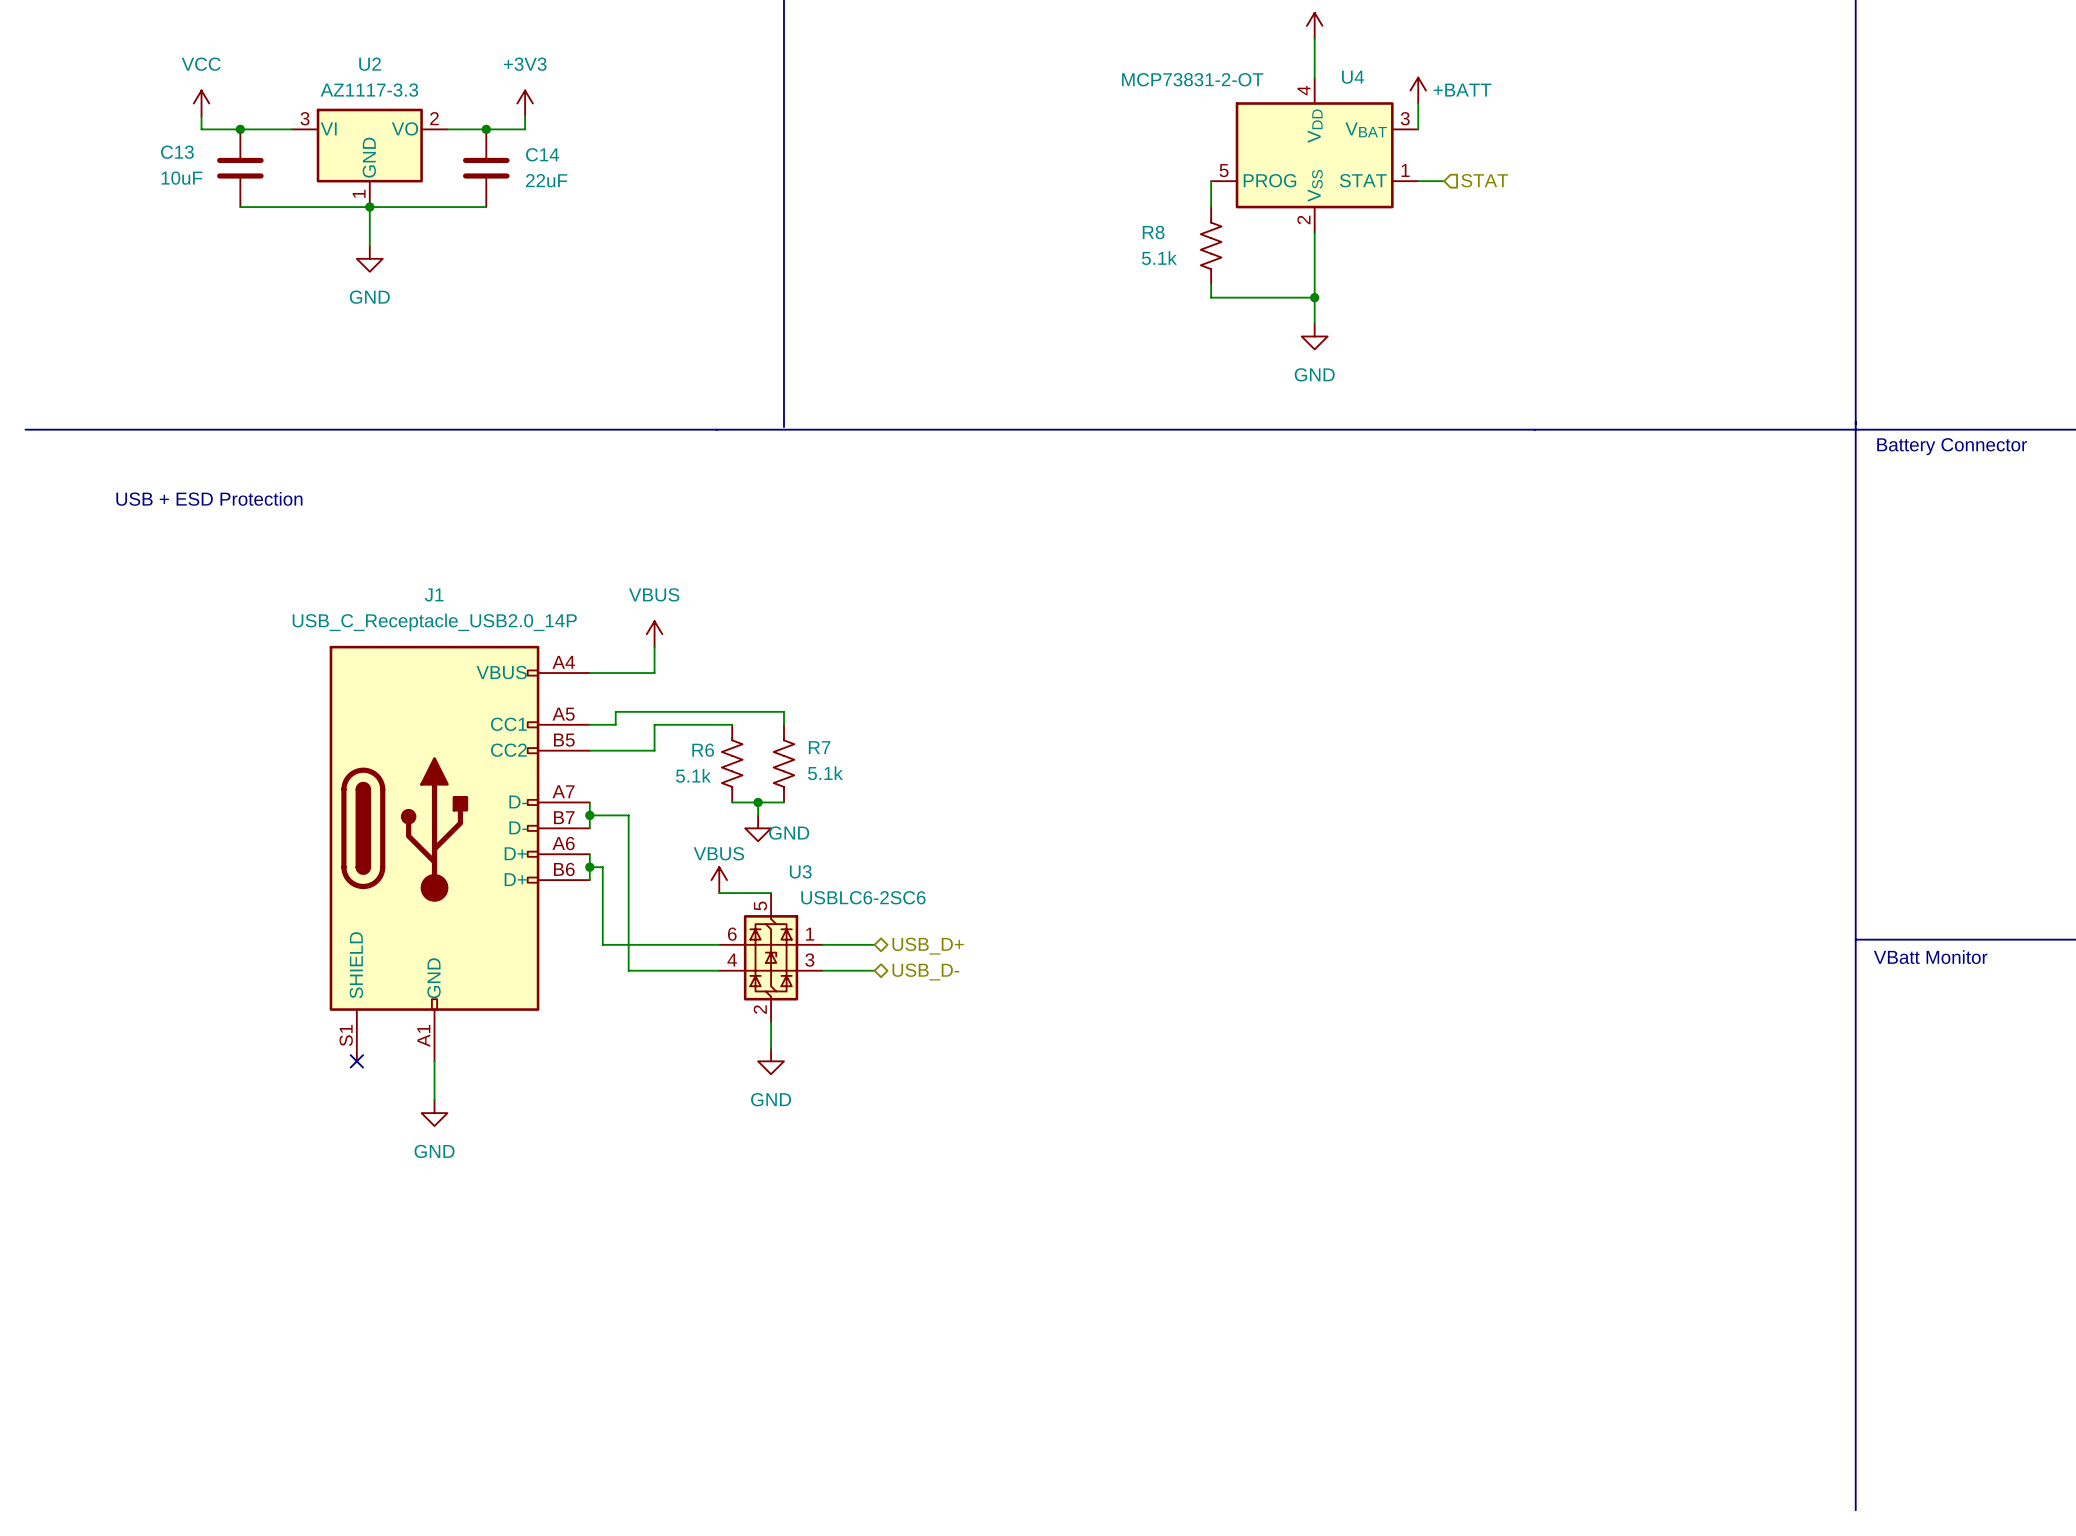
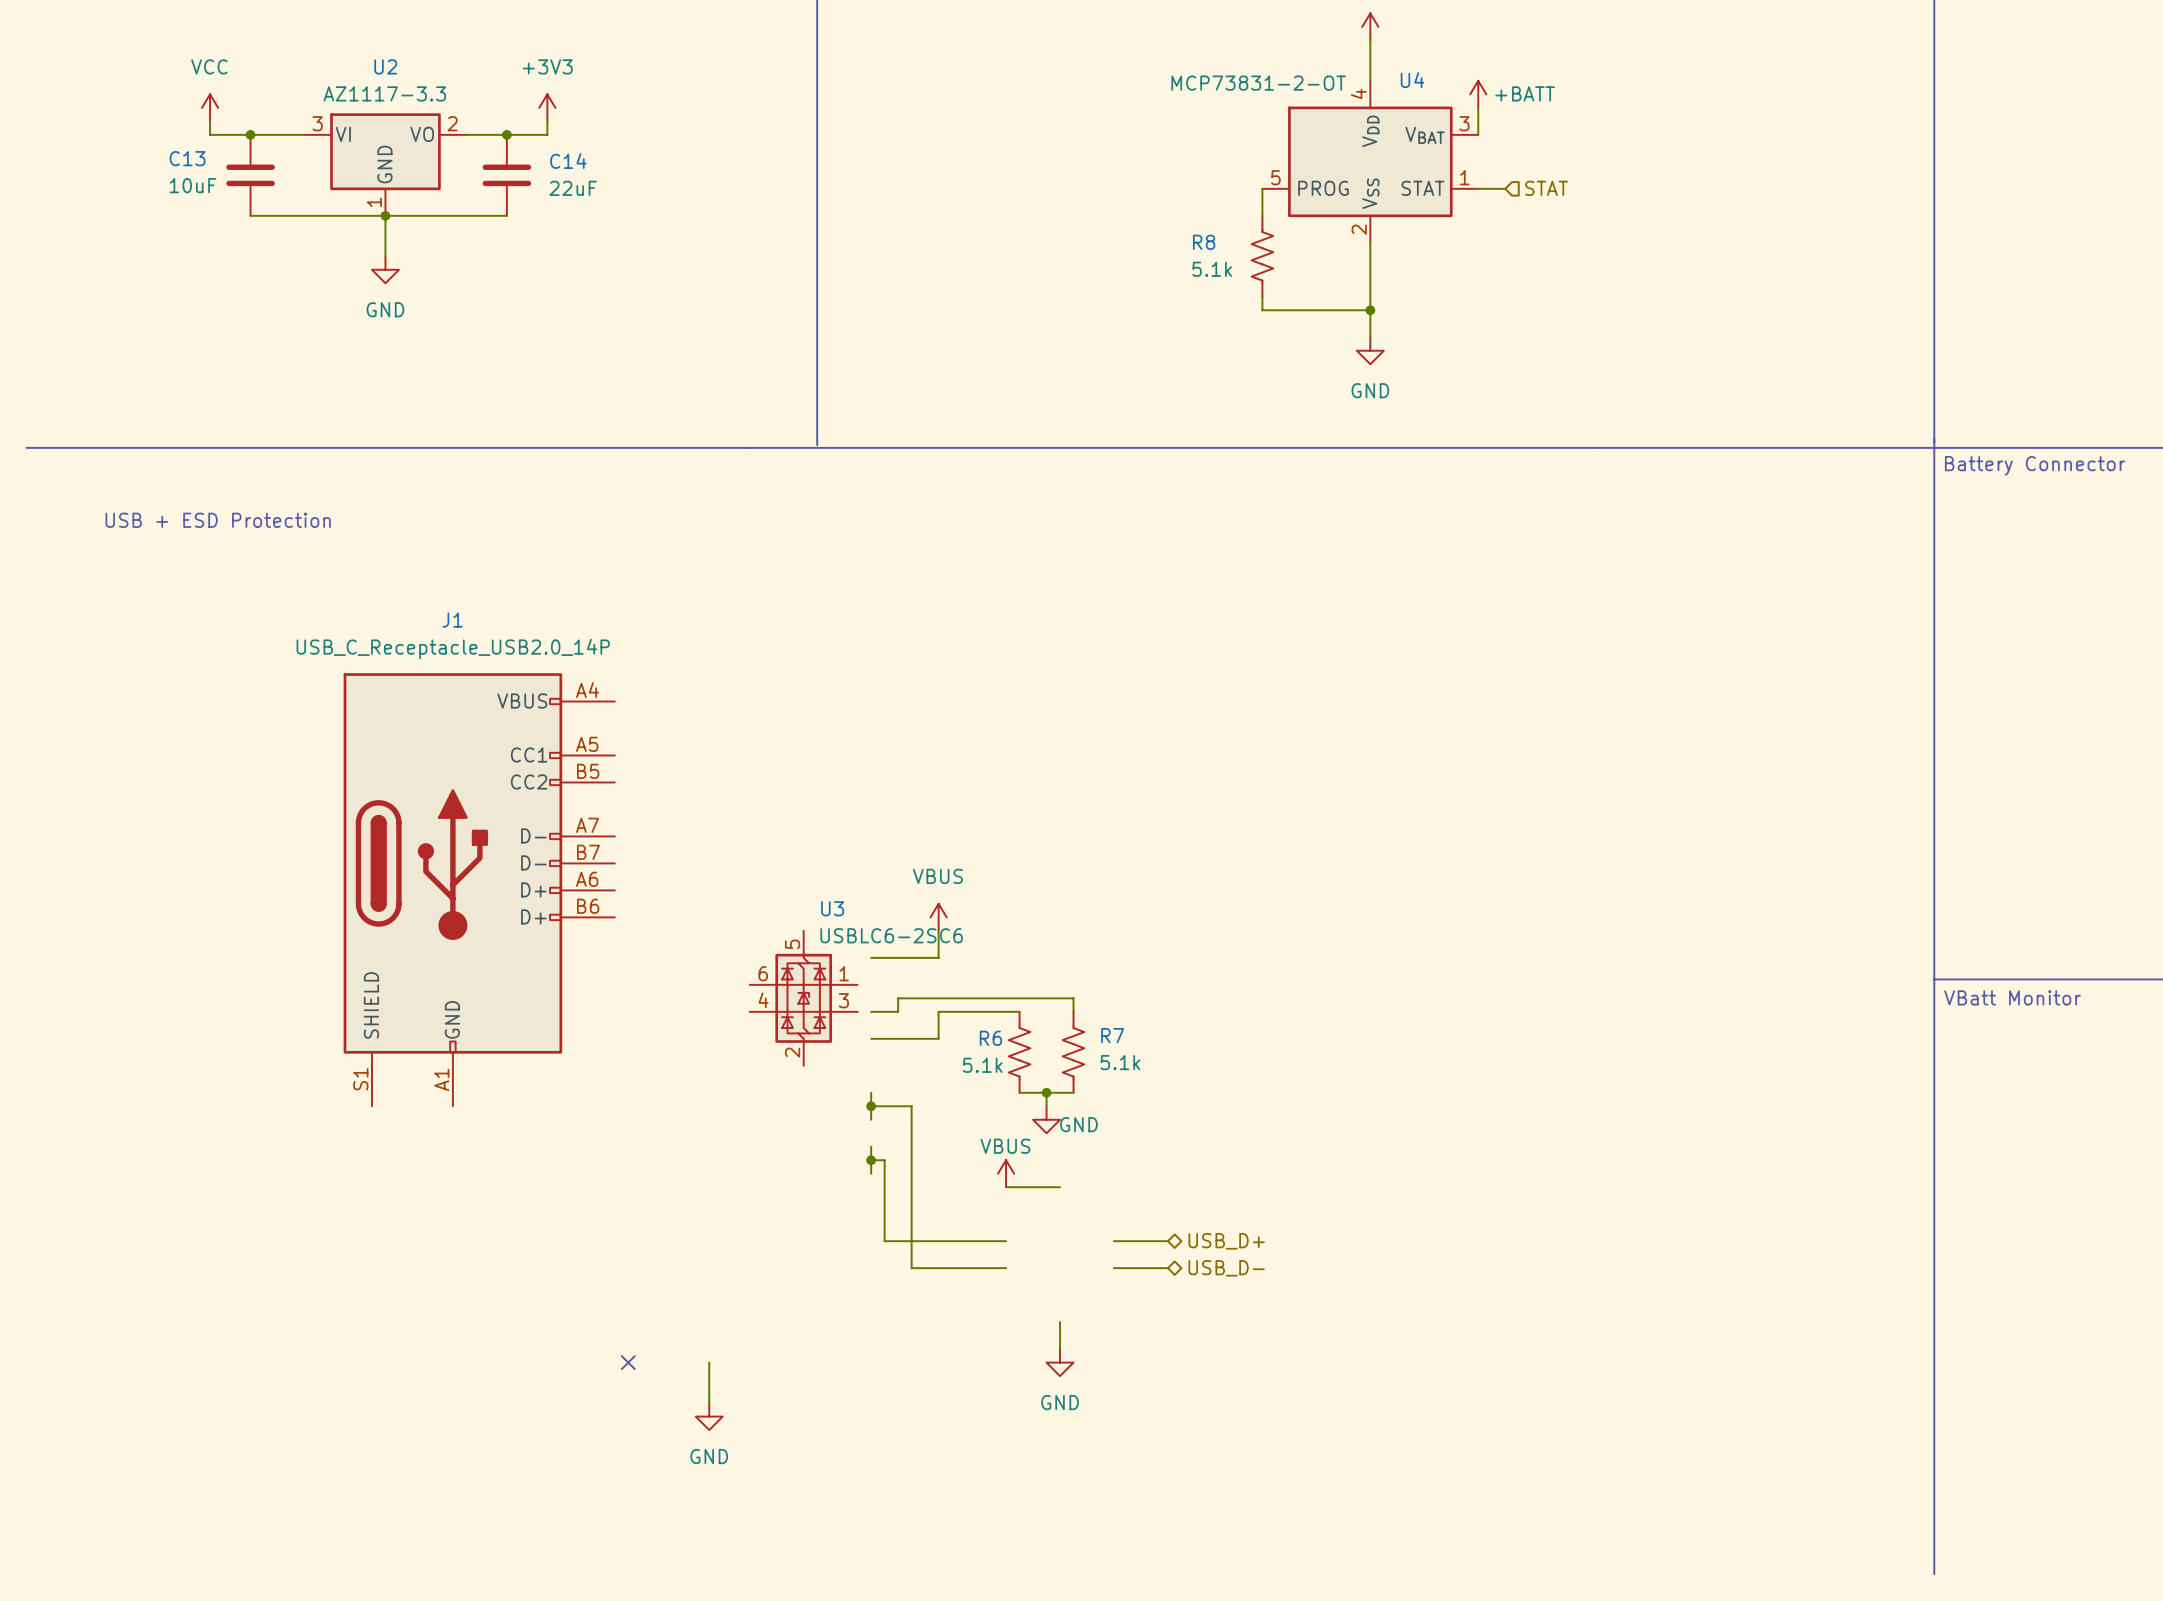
power symbol: VBUS (654, 634) -> none
wire: (654, 647) (654, 673) (589, 673) -> none
wire: (589, 724) (615, 724) (615, 711) (783, 711) (783, 724) -> none
wire: (732, 724) (654, 724) (654, 750) (589, 750) -> none
R6 position: (732, 763) -> (1019, 1052)
R7 position: (783, 763) -> (1073, 1052)
wire: (589, 802) (589, 828) -> none
wire: (732, 802) (783, 802) -> none
wire: (758, 802) (758, 815) -> none
junction: (758, 802) -> none
wire: (589, 815) (628, 815) (628, 970) (719, 970) -> none
junction: (589, 815) -> none
power symbol: GND (758, 828) -> none
wire: (589, 854) (589, 880) -> none
wire: (589, 867) (602, 867) (602, 944) (719, 944) -> none
junction: (589, 867) -> none
power symbol: VBUS (719, 880) -> none
power symbol: none -> VBUS (938, 917)
wire: (719, 893) (771, 893) -> none
wire: none -> (938, 930) (938, 957) (871, 957)
wire: (822, 944) (874, 944) -> (1019, 1092) (1073, 1092)
hierarchical label: USB_D+ (928, 946) -> none
wire: (822, 970) (835, 970) -> none
wire: (861, 970) (874, 970) -> (898, 1011) (898, 998) (1073, 998) (1073, 1011)
wire: none -> (1019, 1011) (938, 1011) (938, 1038) (871, 1038)
hierarchical label: USB_D- (925, 972) -> none
wire: (771, 1022) (771, 1048) -> (871, 1092) (871, 1119)
wire: none -> (1046, 1092) (1046, 1106)
junction: none -> (1046, 1092)
no-connect mark: (356, 1061) -> none
wire: (434, 1061) (434, 1100) -> none
power symbol: GND (771, 1061) -> none
wire: none -> (871, 1106) (911, 1106) (911, 1268) (1006, 1268)
junction: none -> (871, 1106)
power symbol: none -> GND (1046, 1119)
wire: none -> (871, 1146) (871, 1173)
power symbol: GND (434, 1113) -> none
wire: none -> (871, 1160) (884, 1160) (884, 1241) (1006, 1241)
junction: none -> (871, 1160)
power symbol: none -> VBUS (1006, 1173)
wire: none -> (1006, 1187) (1060, 1187)
wire: none -> (1114, 1241) (1167, 1241)
hierarchical label: none -> USB_D+ (1226, 1241)
wire: none -> (1114, 1268) (1167, 1268)
hierarchical label: none -> USB_D- (1226, 1268)
wire: none -> (1060, 1322) (1060, 1349)
no-connect mark: none -> (628, 1362)
wire: none -> (709, 1362) (709, 1403)
power symbol: none -> GND (1060, 1362)
power symbol: none -> GND (709, 1416)

